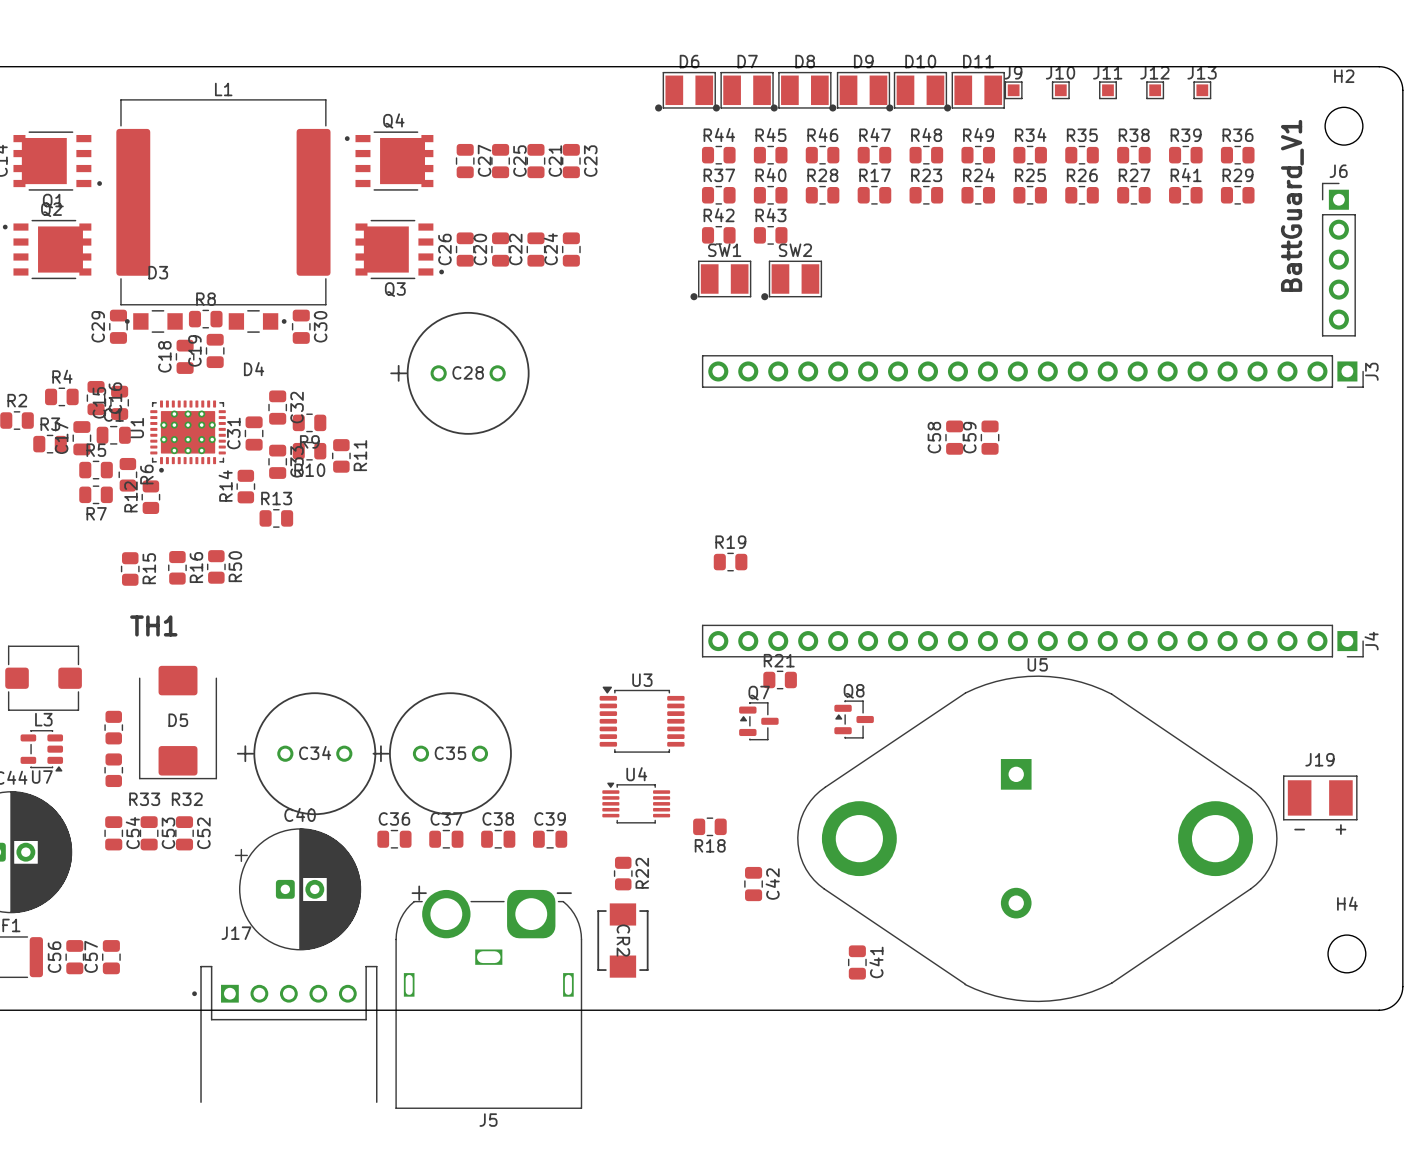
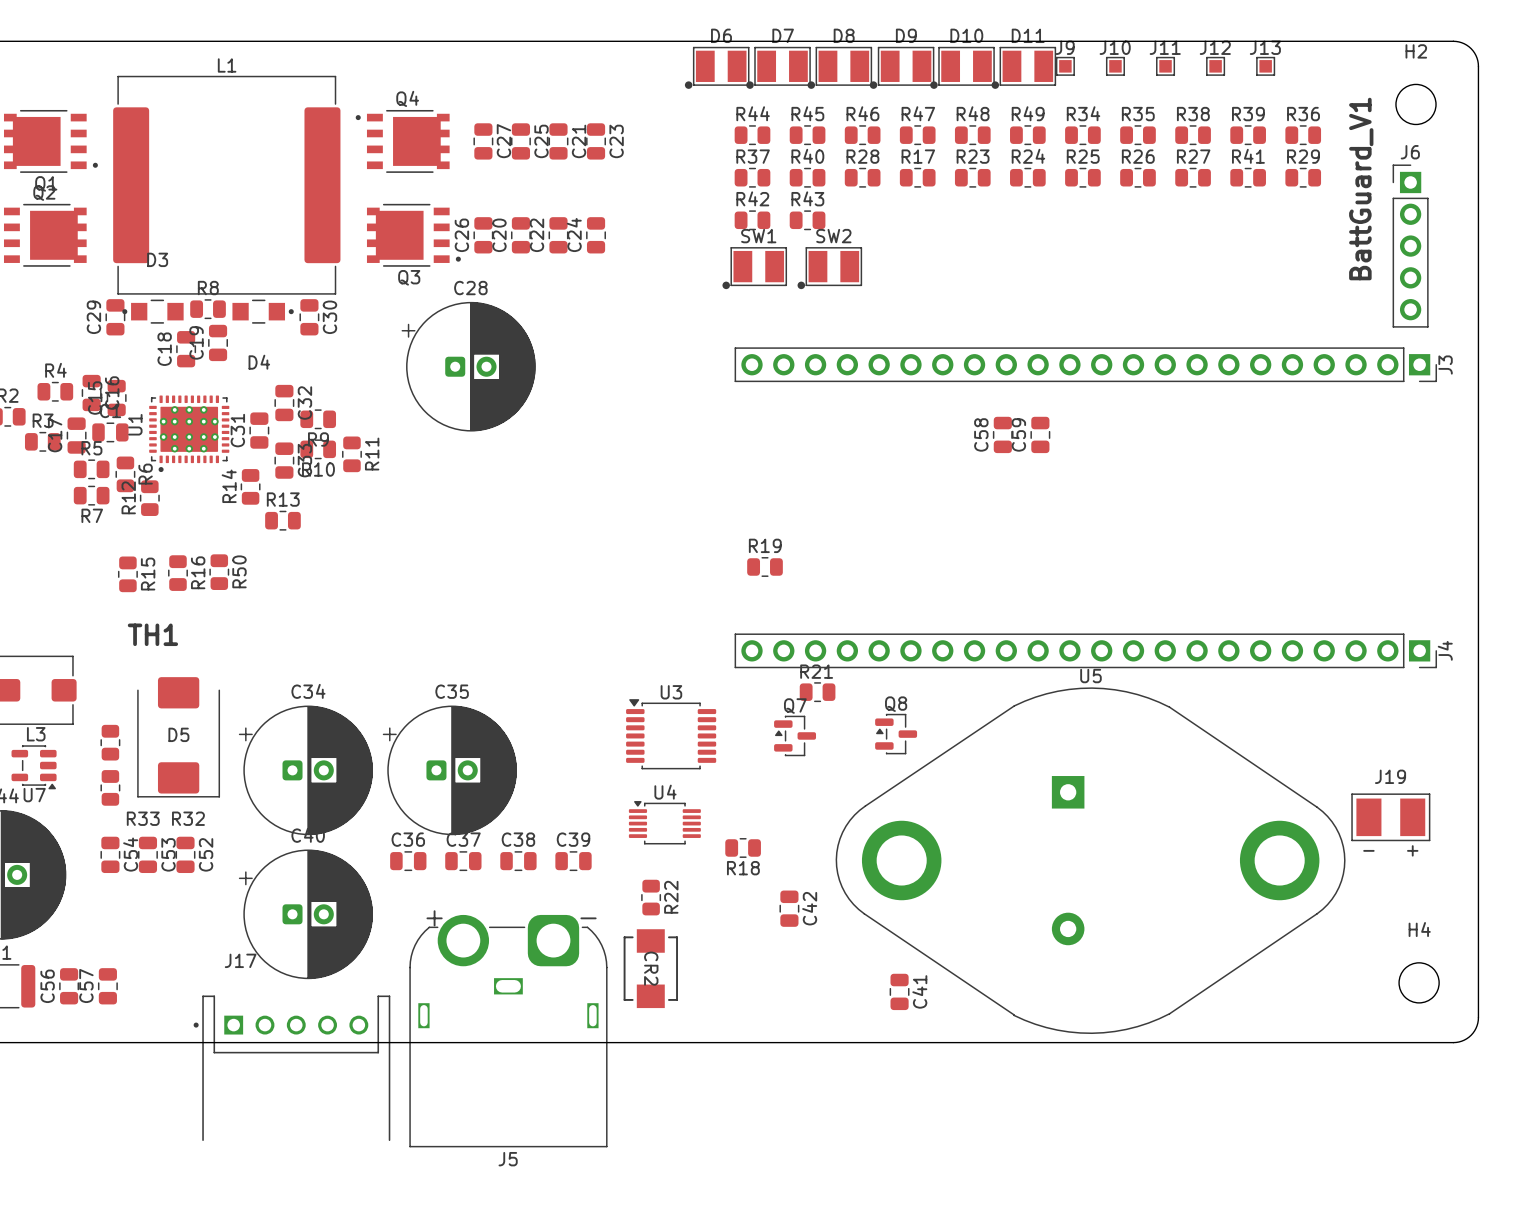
C28 footprint: [390, 311, 530, 435] -> [401, 301, 536, 432]
C28 name position: C28 (468, 372) -> C28 (470, 288)
C34 footprint: [236, 692, 377, 816] -> [238, 705, 373, 836]
C35 footprint: [372, 692, 512, 816] -> [382, 705, 517, 836]
C34 name position: C34 (315, 752) -> C34 (308, 691)
C35 name position: C35 (450, 753) -> C35 (452, 691)

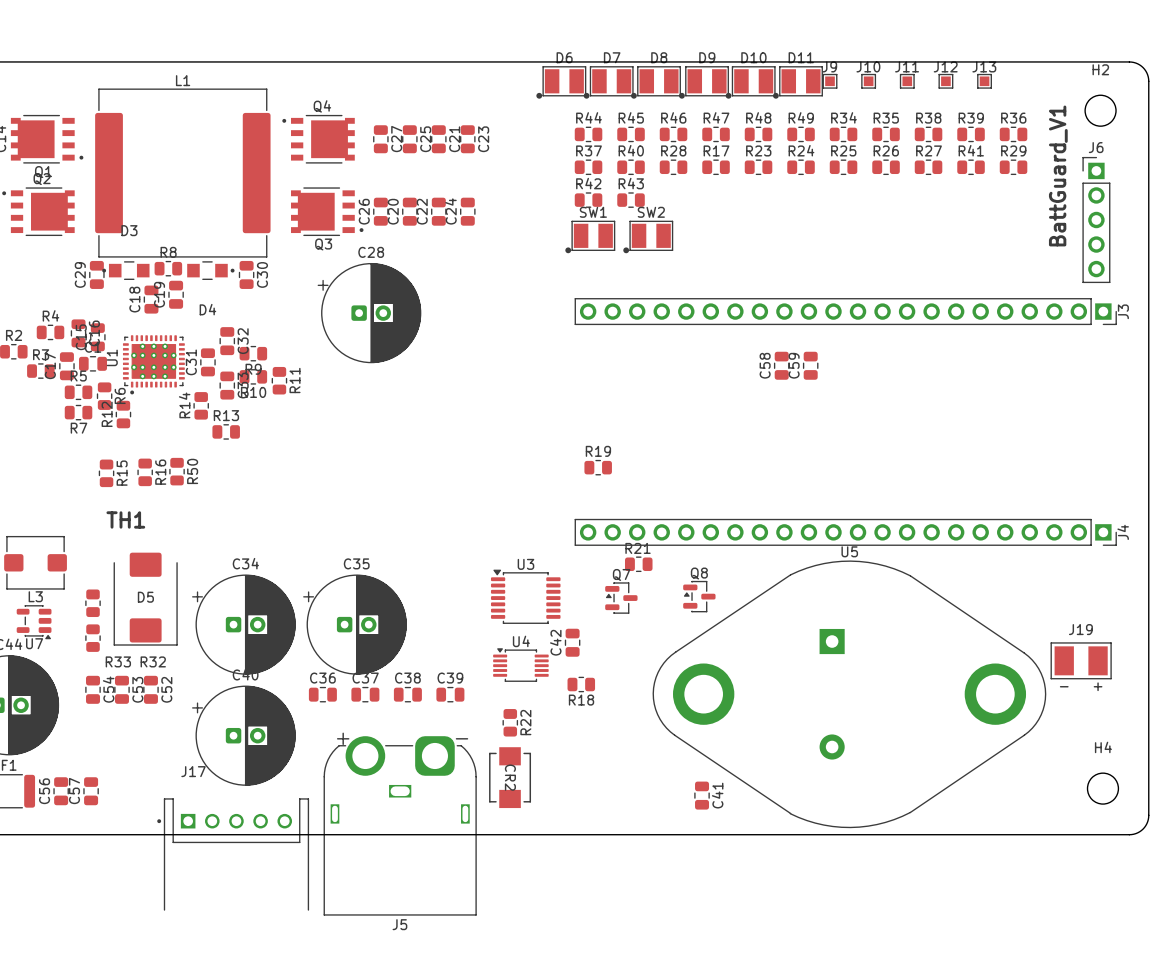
C42 position: (789, 908) -> (572, 642)
C42 name position: C42 (809, 908) -> C42 (555, 642)

